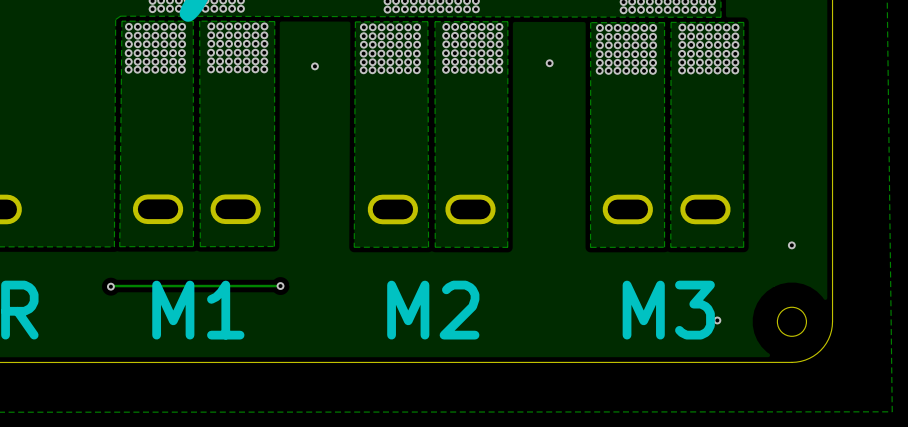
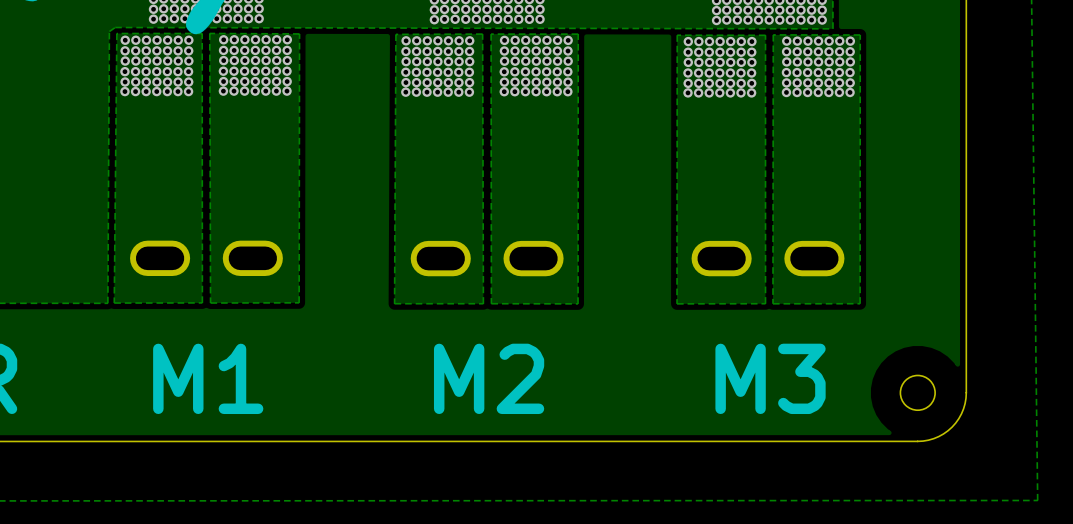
via: (549, 63) -> none
via: (314, 66) -> none
via: (791, 245) -> none
via: (110, 286) -> none
track: (280, 286) (110, 286) -> none
via: (280, 286) -> none
via: (717, 320) -> none

